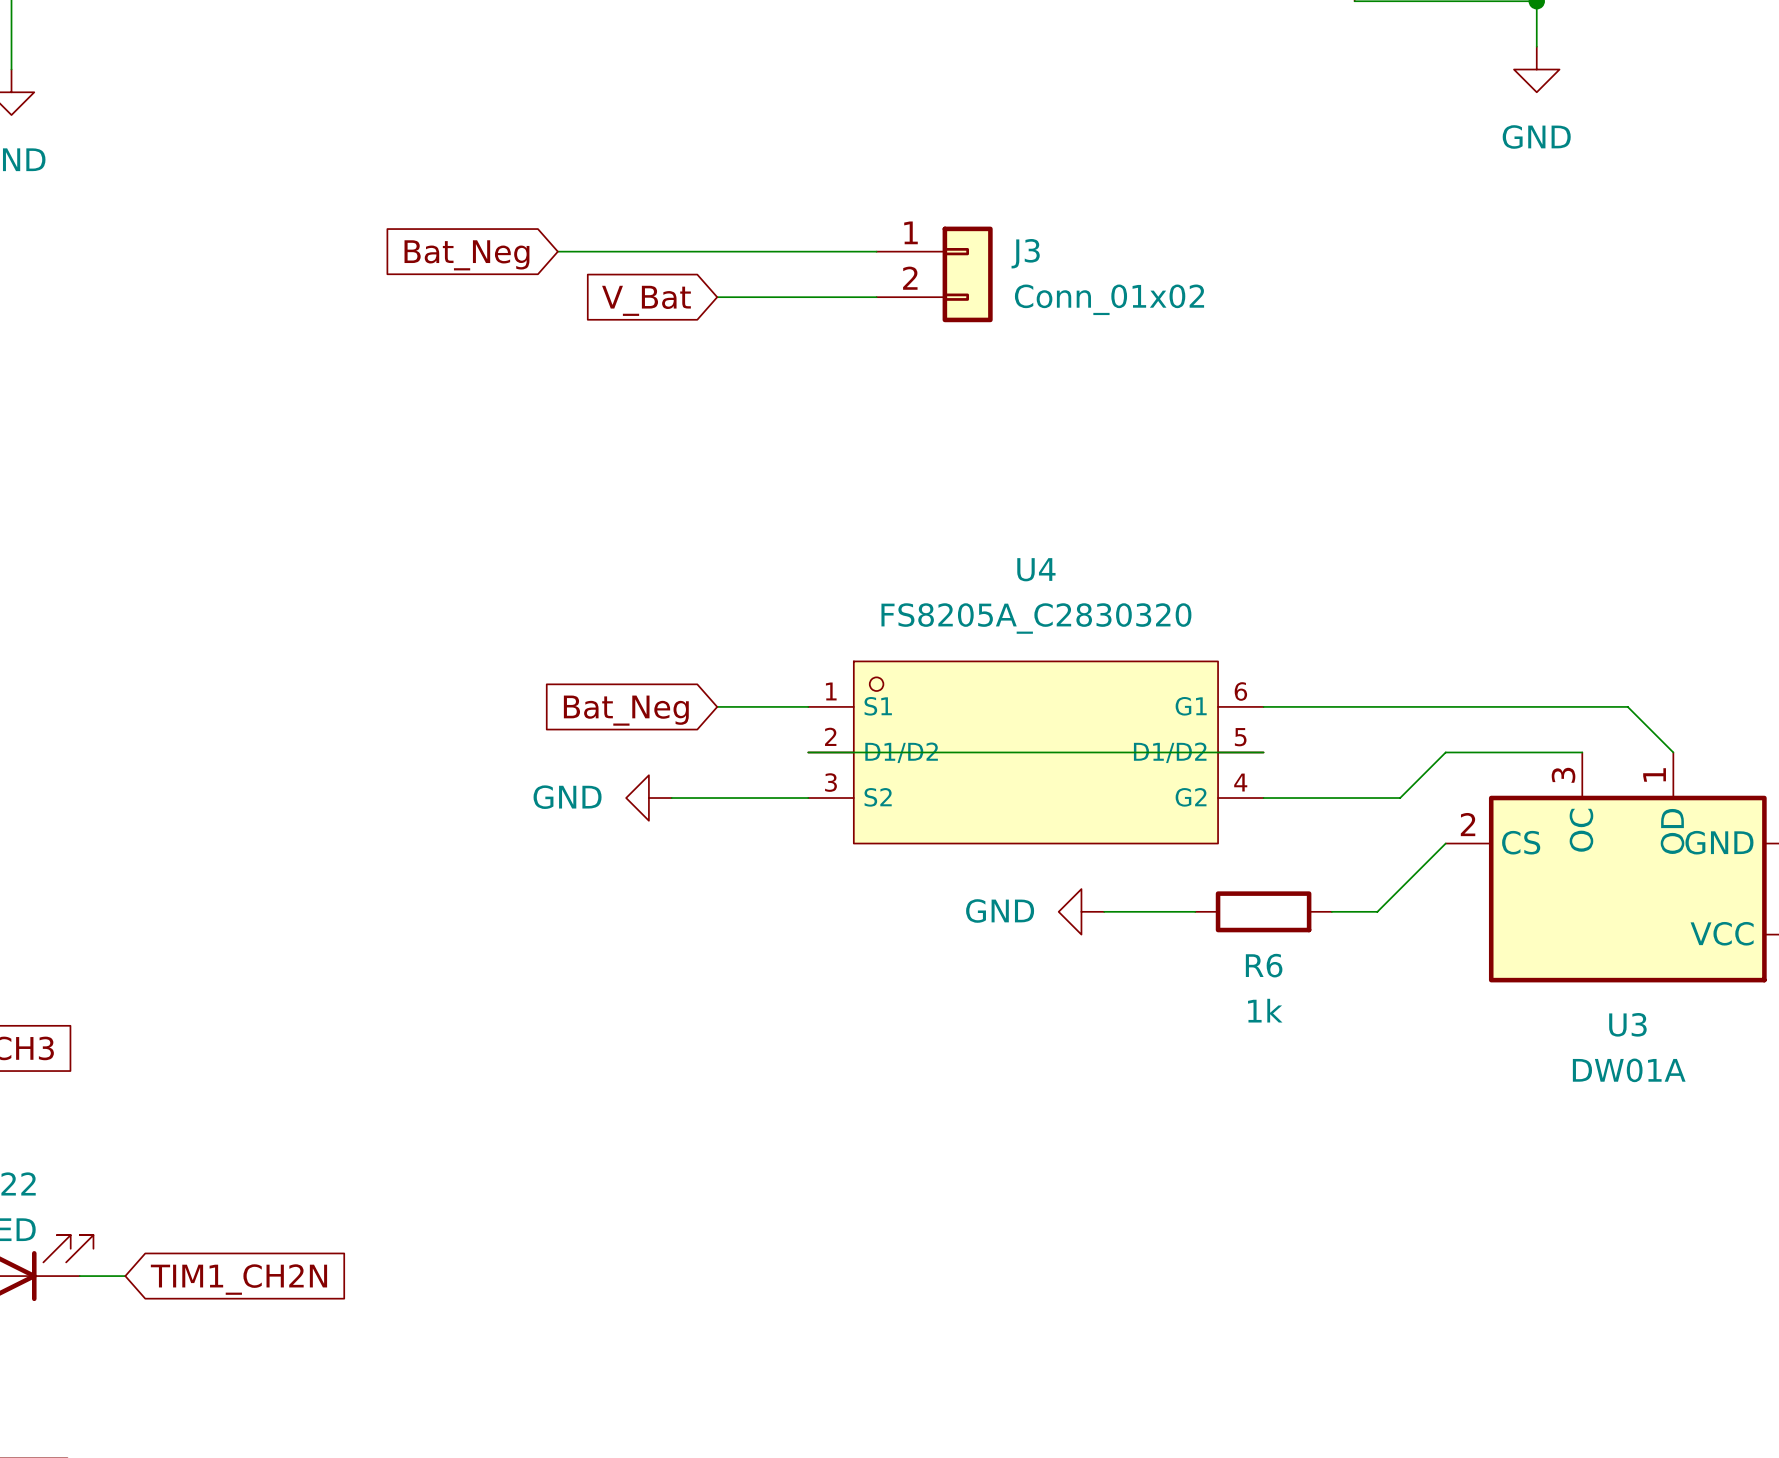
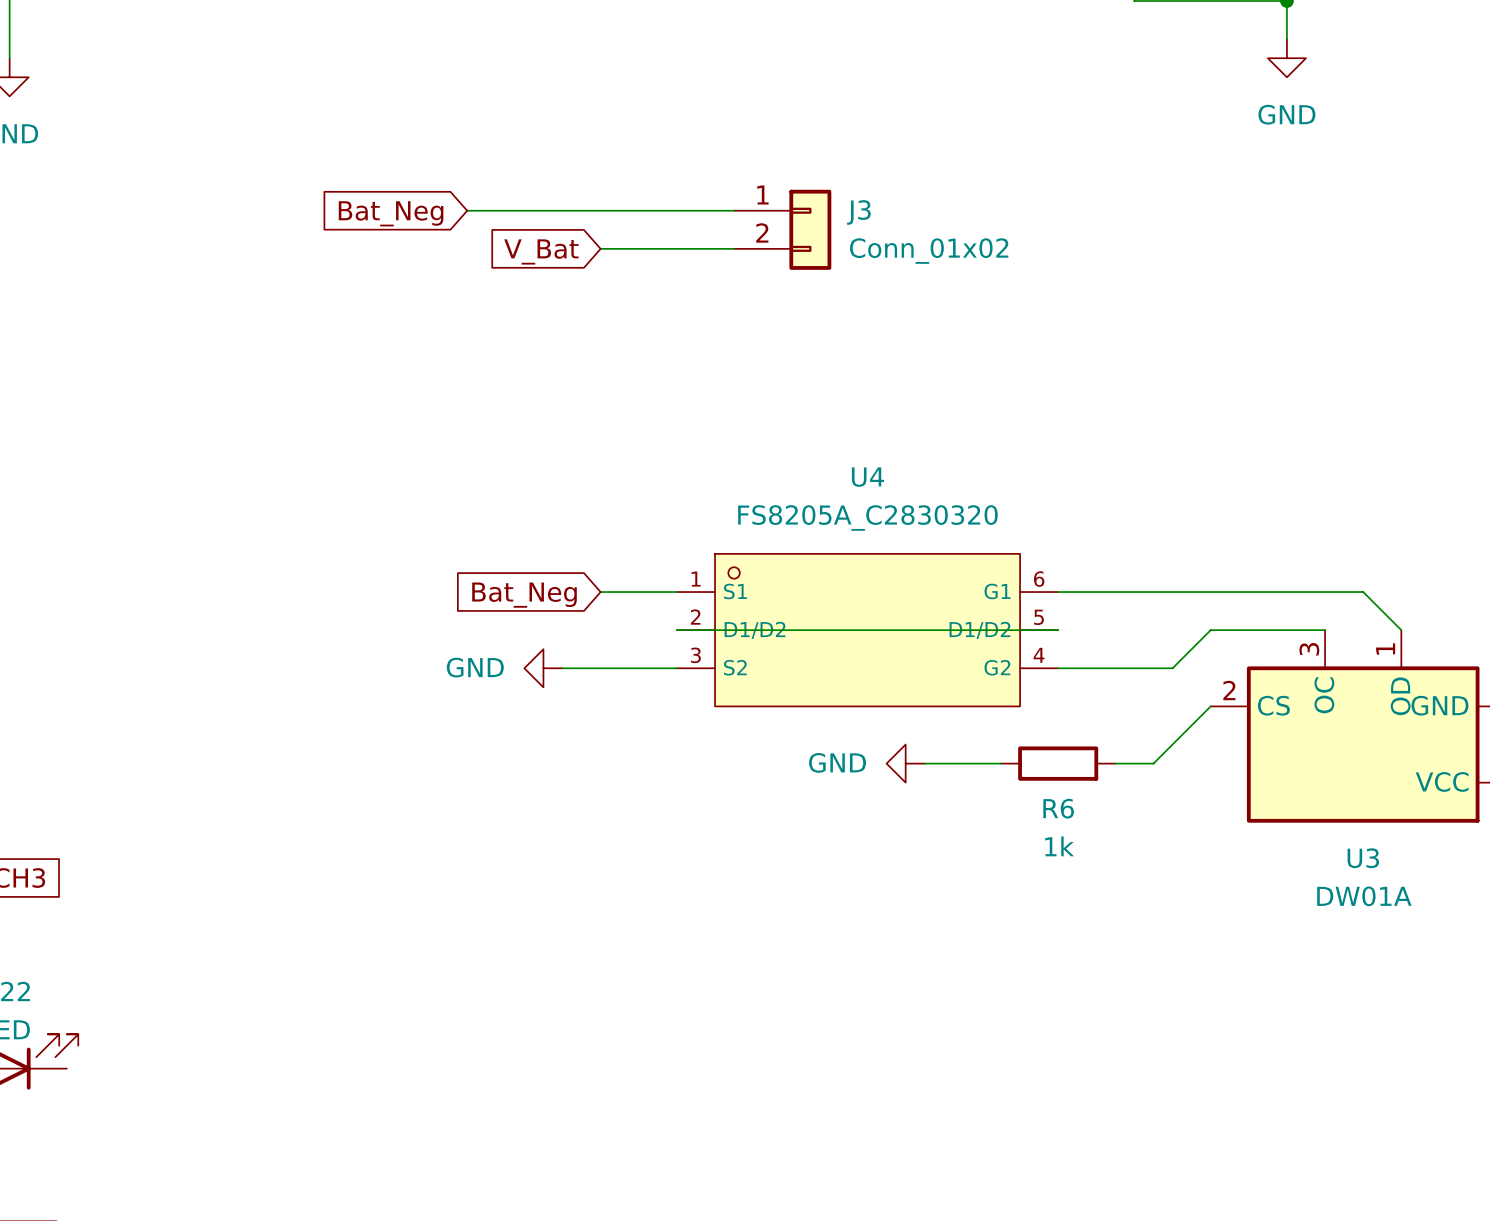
wire: (79, 1276) (125, 1276) -> none
global label: TIM1_CH2N (238, 1279) -> none

